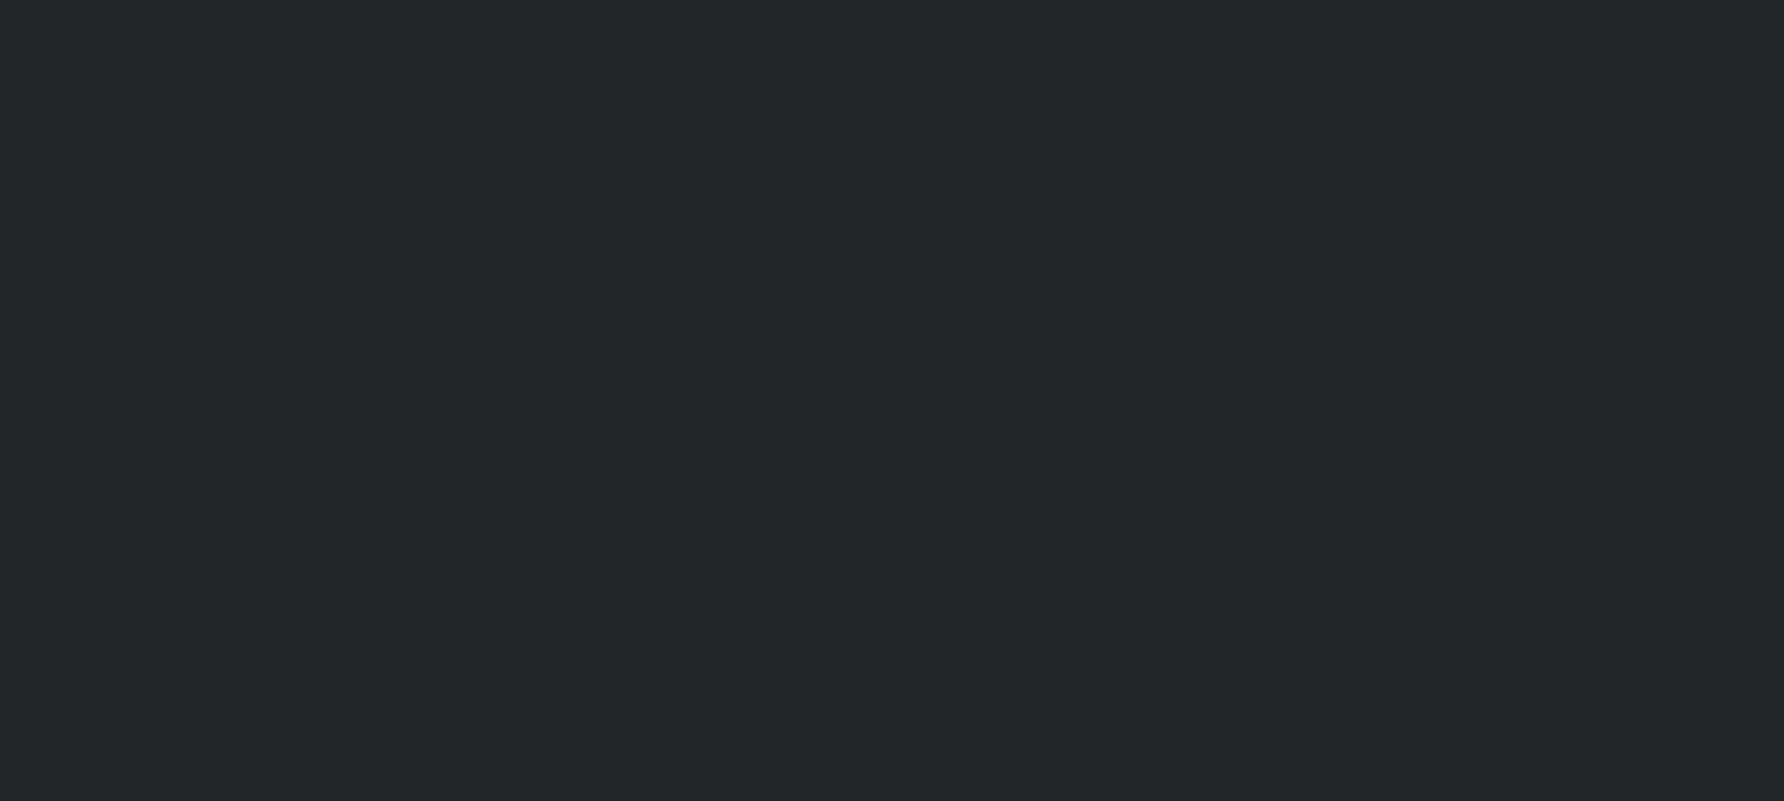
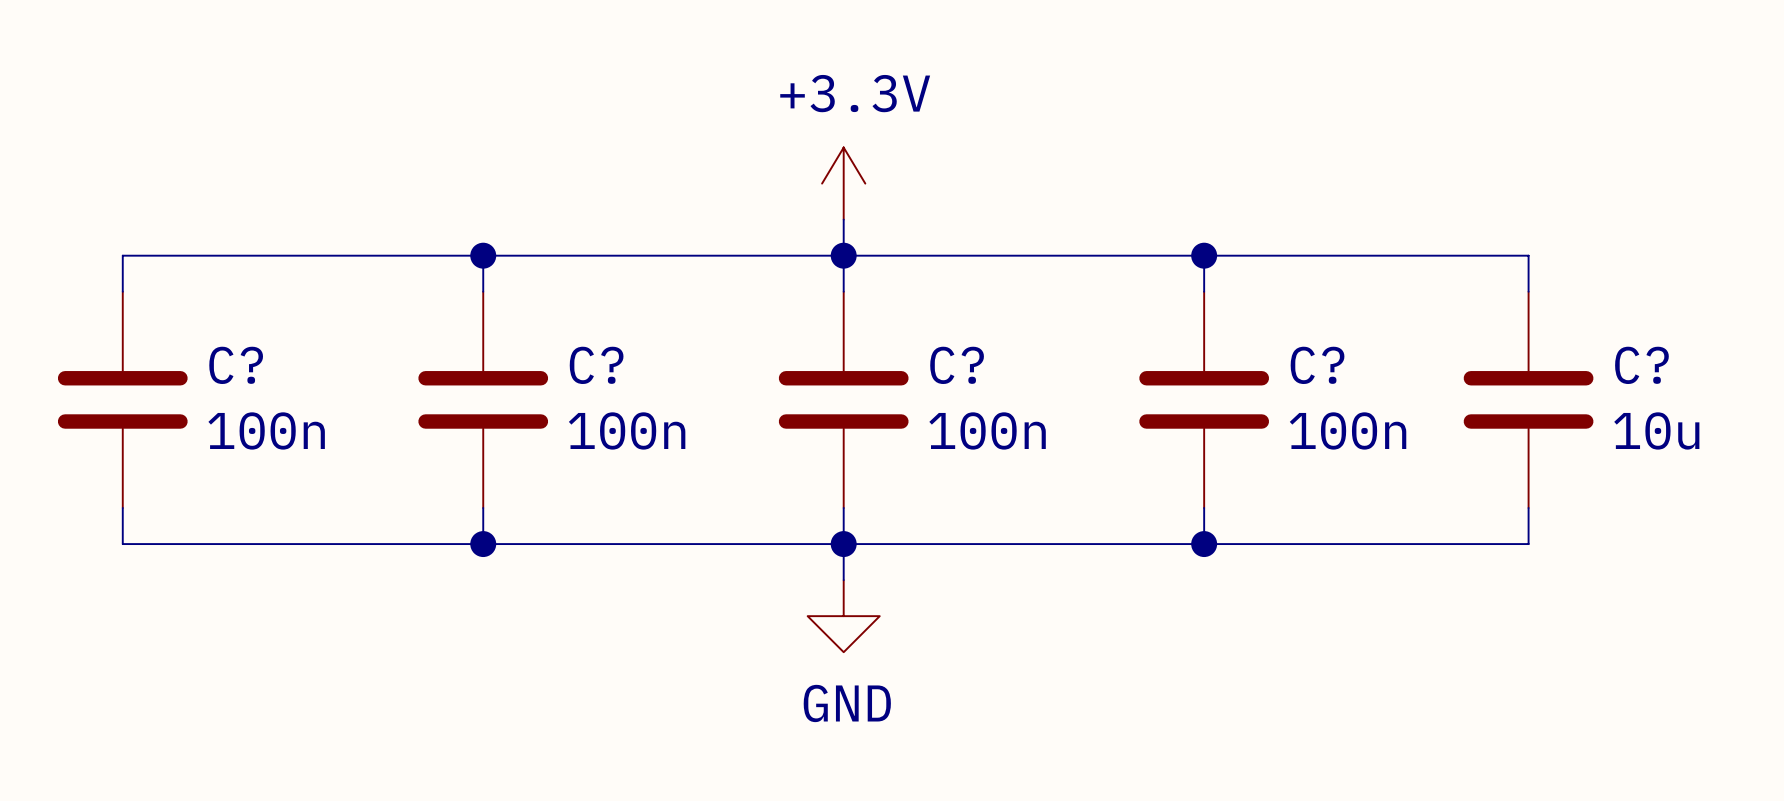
power symbol: none -> +3.3V (843, 183)
wire: none -> (843, 219) (843, 291)
wire: none -> (483, 255) (483, 291)
junction: none -> (483, 255)
junction: none -> (843, 255)
wire: none -> (1204, 255) (1204, 291)
junction: none -> (1204, 255)
wire: none -> (122, 291) (122, 255) (1528, 255) (1528, 291)
C?: none -> 100n (122, 399)
C?: none -> 100n (483, 399)
C?: none -> 100n (843, 399)
C?: none -> 100n (1204, 399)
C?: none -> 10u (1528, 399)
wire: none -> (122, 508) (122, 544) (1528, 544) (1528, 508)
wire: none -> (483, 508) (483, 544)
wire: none -> (843, 508) (843, 580)
wire: none -> (1204, 508) (1204, 544)
junction: none -> (483, 544)
junction: none -> (843, 544)
junction: none -> (1204, 544)
power symbol: none -> GND (843, 616)

